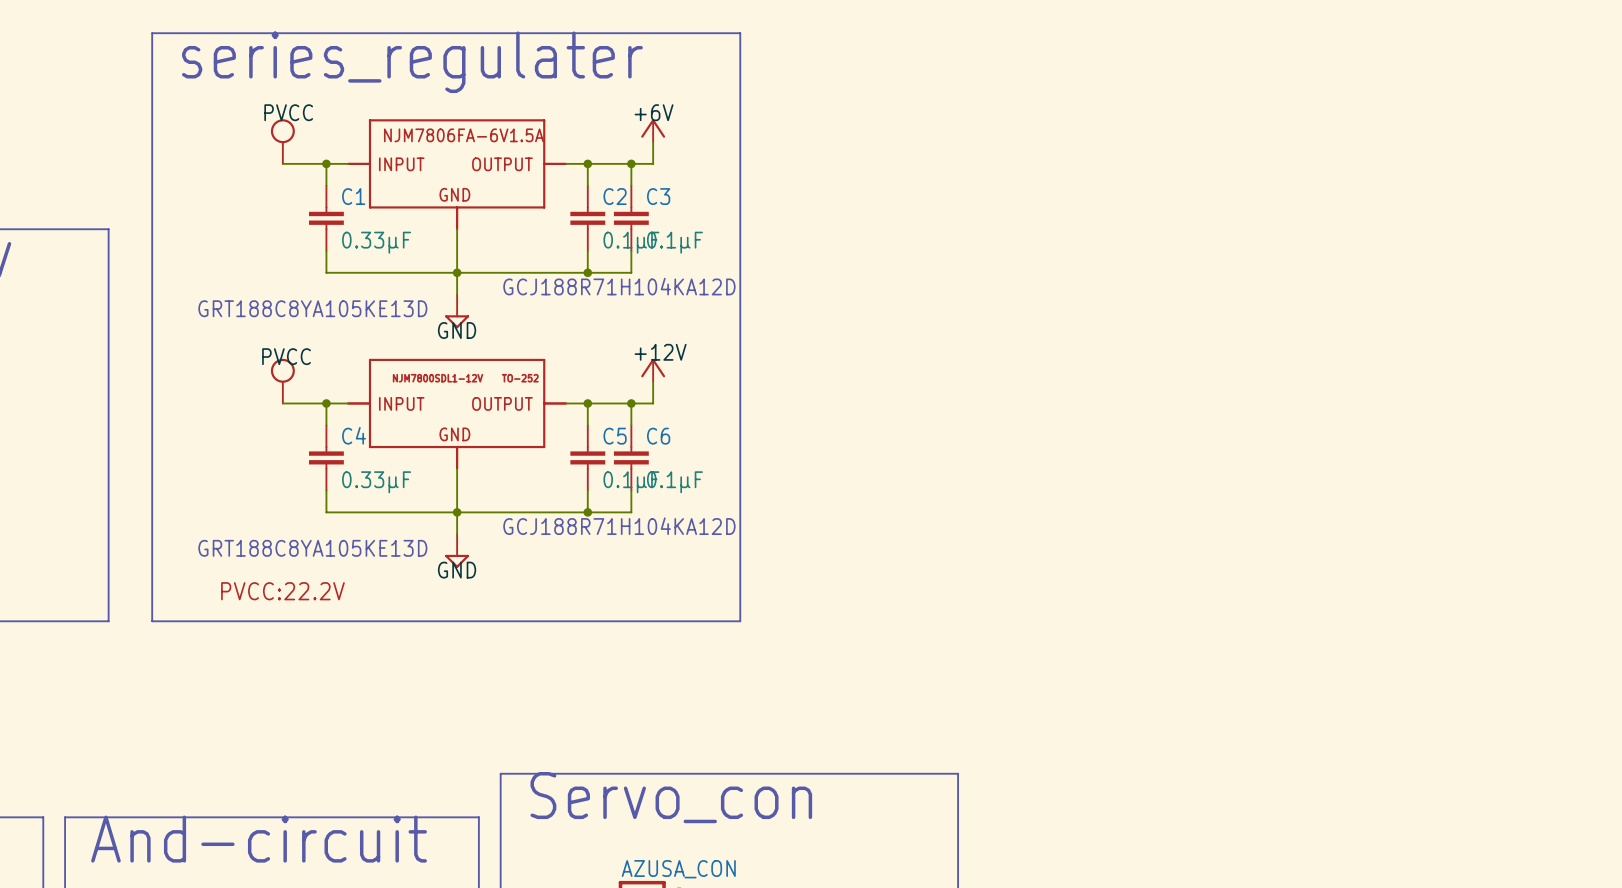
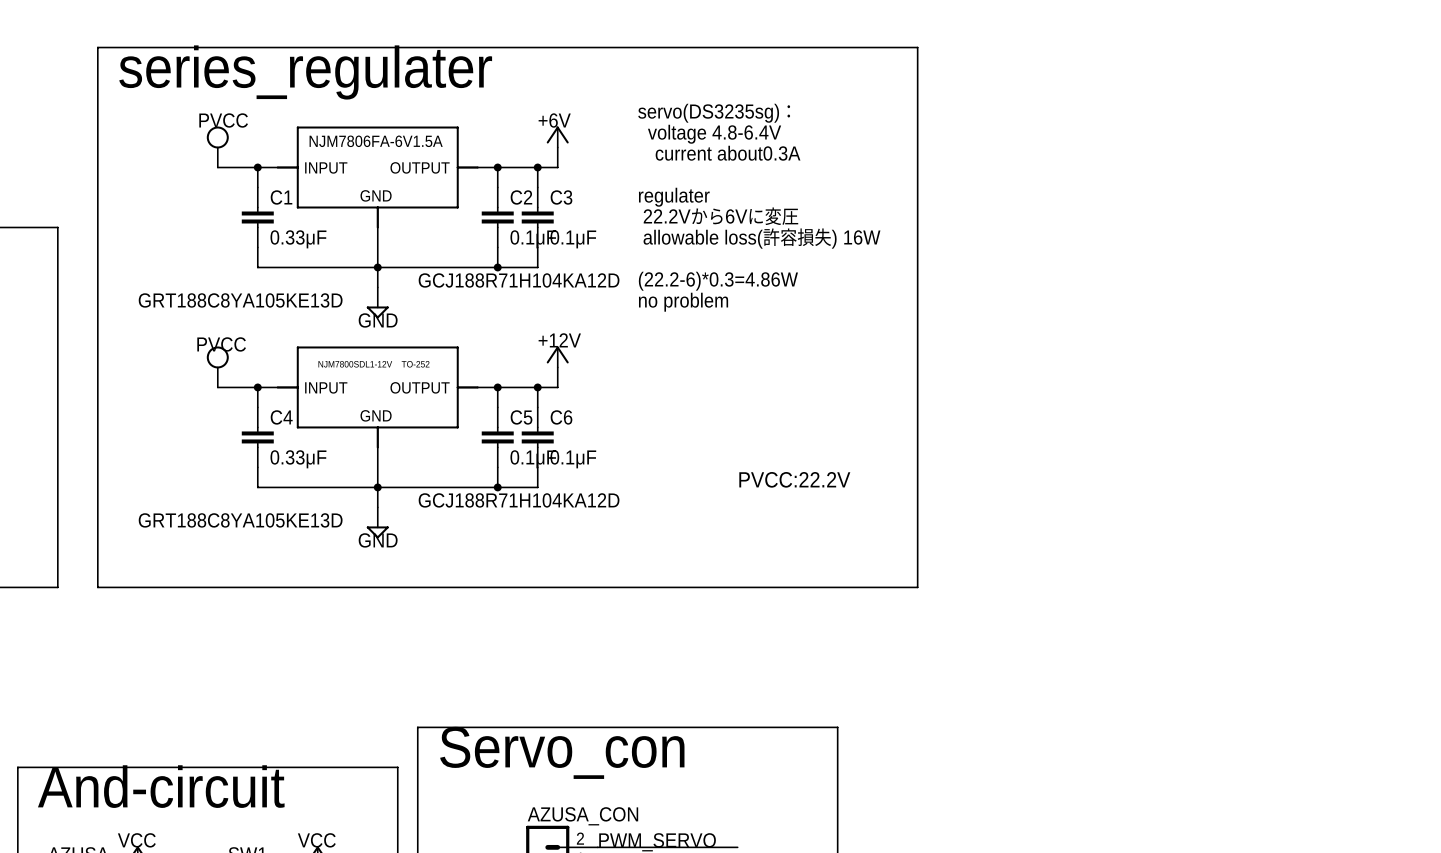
line: (740, 33) (740, 621) -> (637, 47) (917, 47) (917, 587) (637, 587)
text: none -> servo(DS3235sg)： (714, 113)
text: none -> voltage 4.8-6.4V (714, 134)
text: none -> current about0.3A (728, 153)
text: none -> regulater (674, 197)
text: none -> 22.2Vから6Vに変圧 (720, 216)
text: none -> allowable loss(許容損失) 16W (762, 238)
text: none -> (22.2-6)*0.3=4.86W (718, 281)
text: none -> no problem (683, 302)
text: none -> PVCC:22.2V (794, 479)
text: PVCC:22.2V (282, 591) -> none

